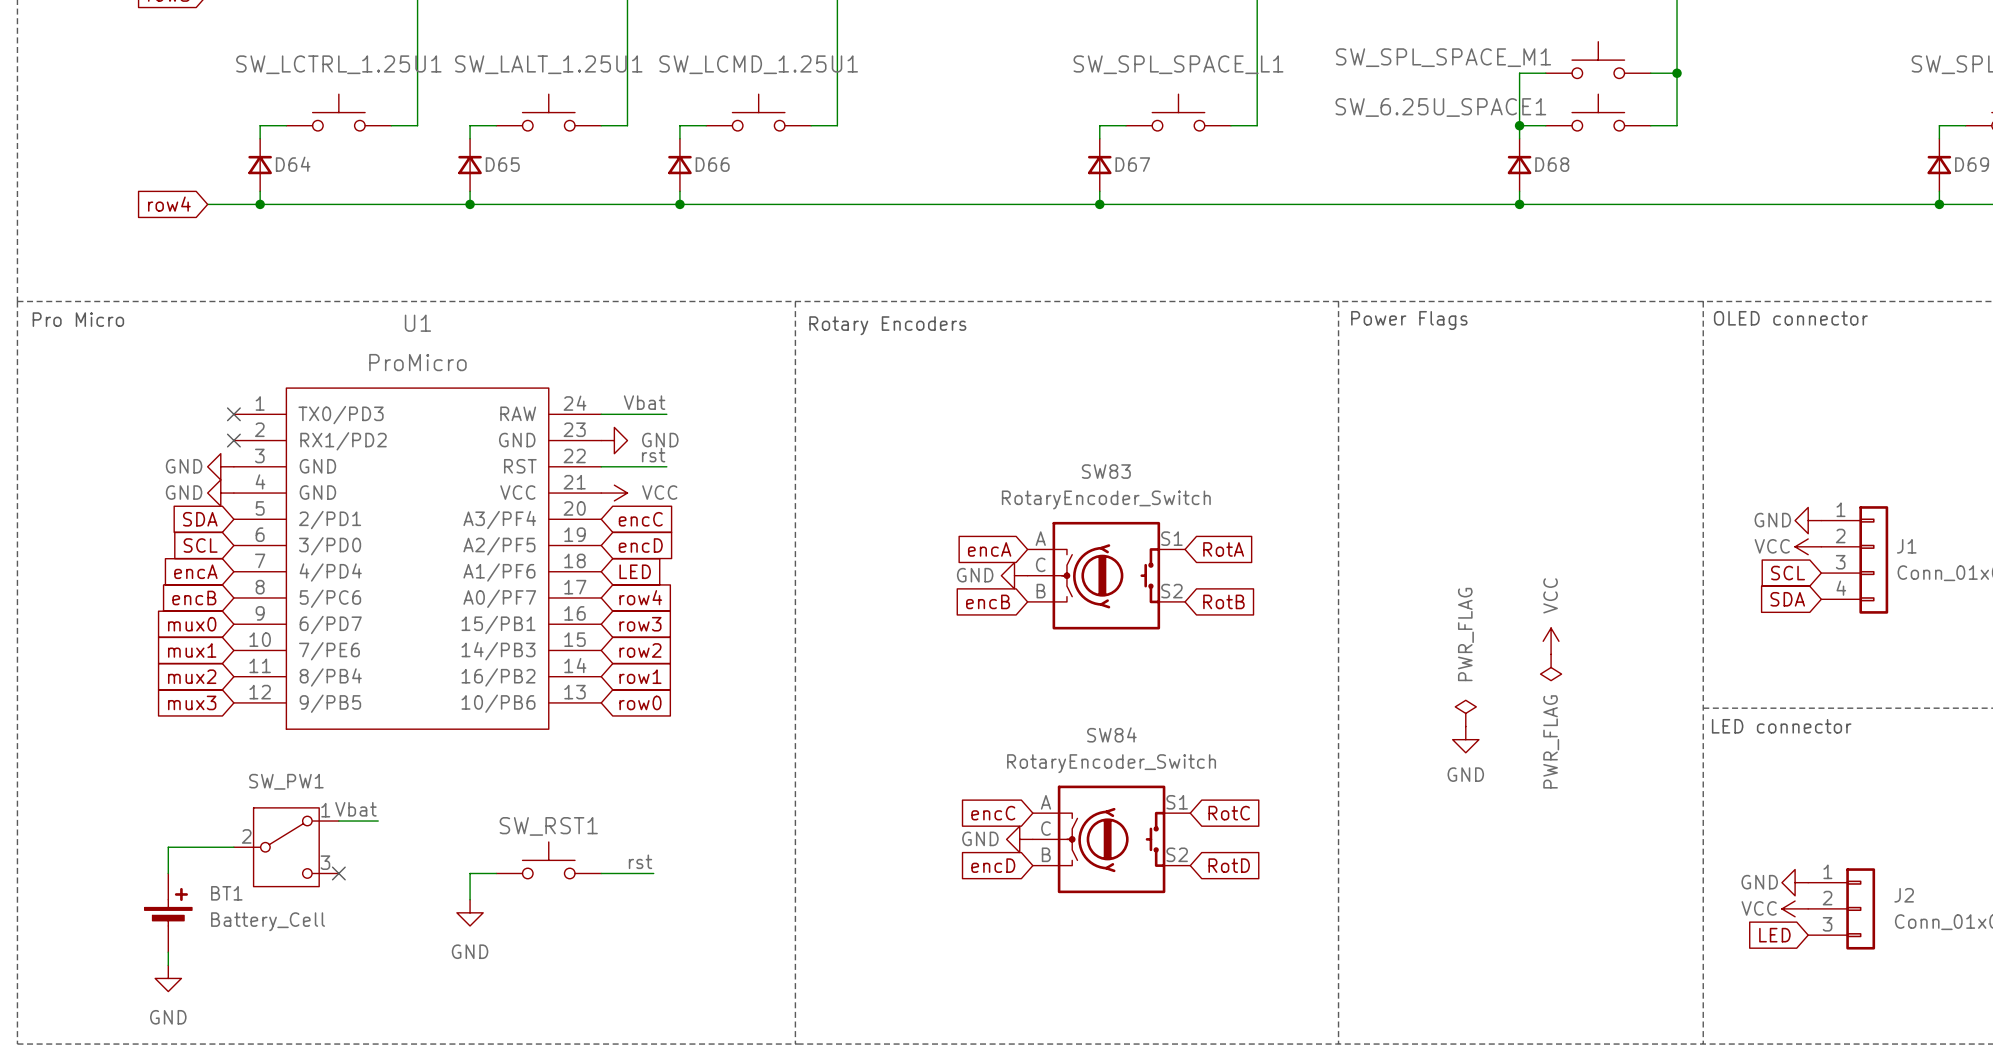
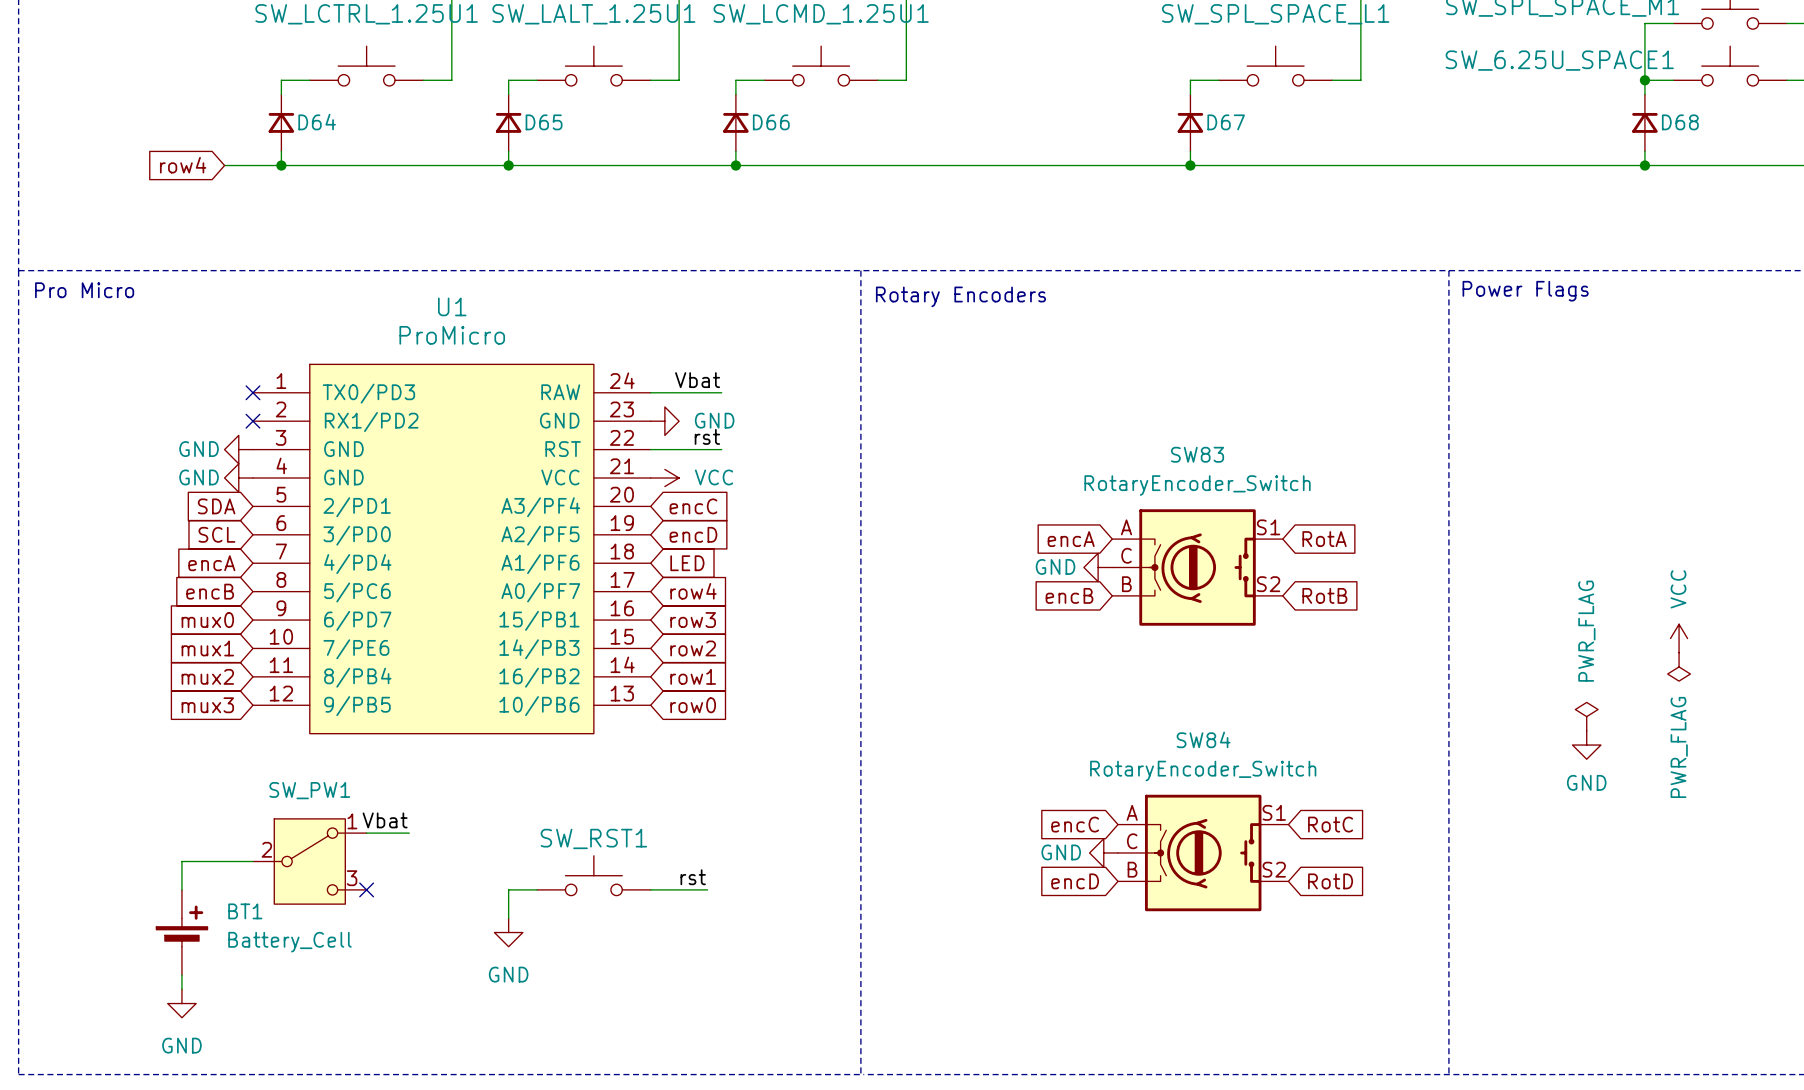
U1 symbol: [233, 388, 602, 730] -> [252, 364, 651, 734]

